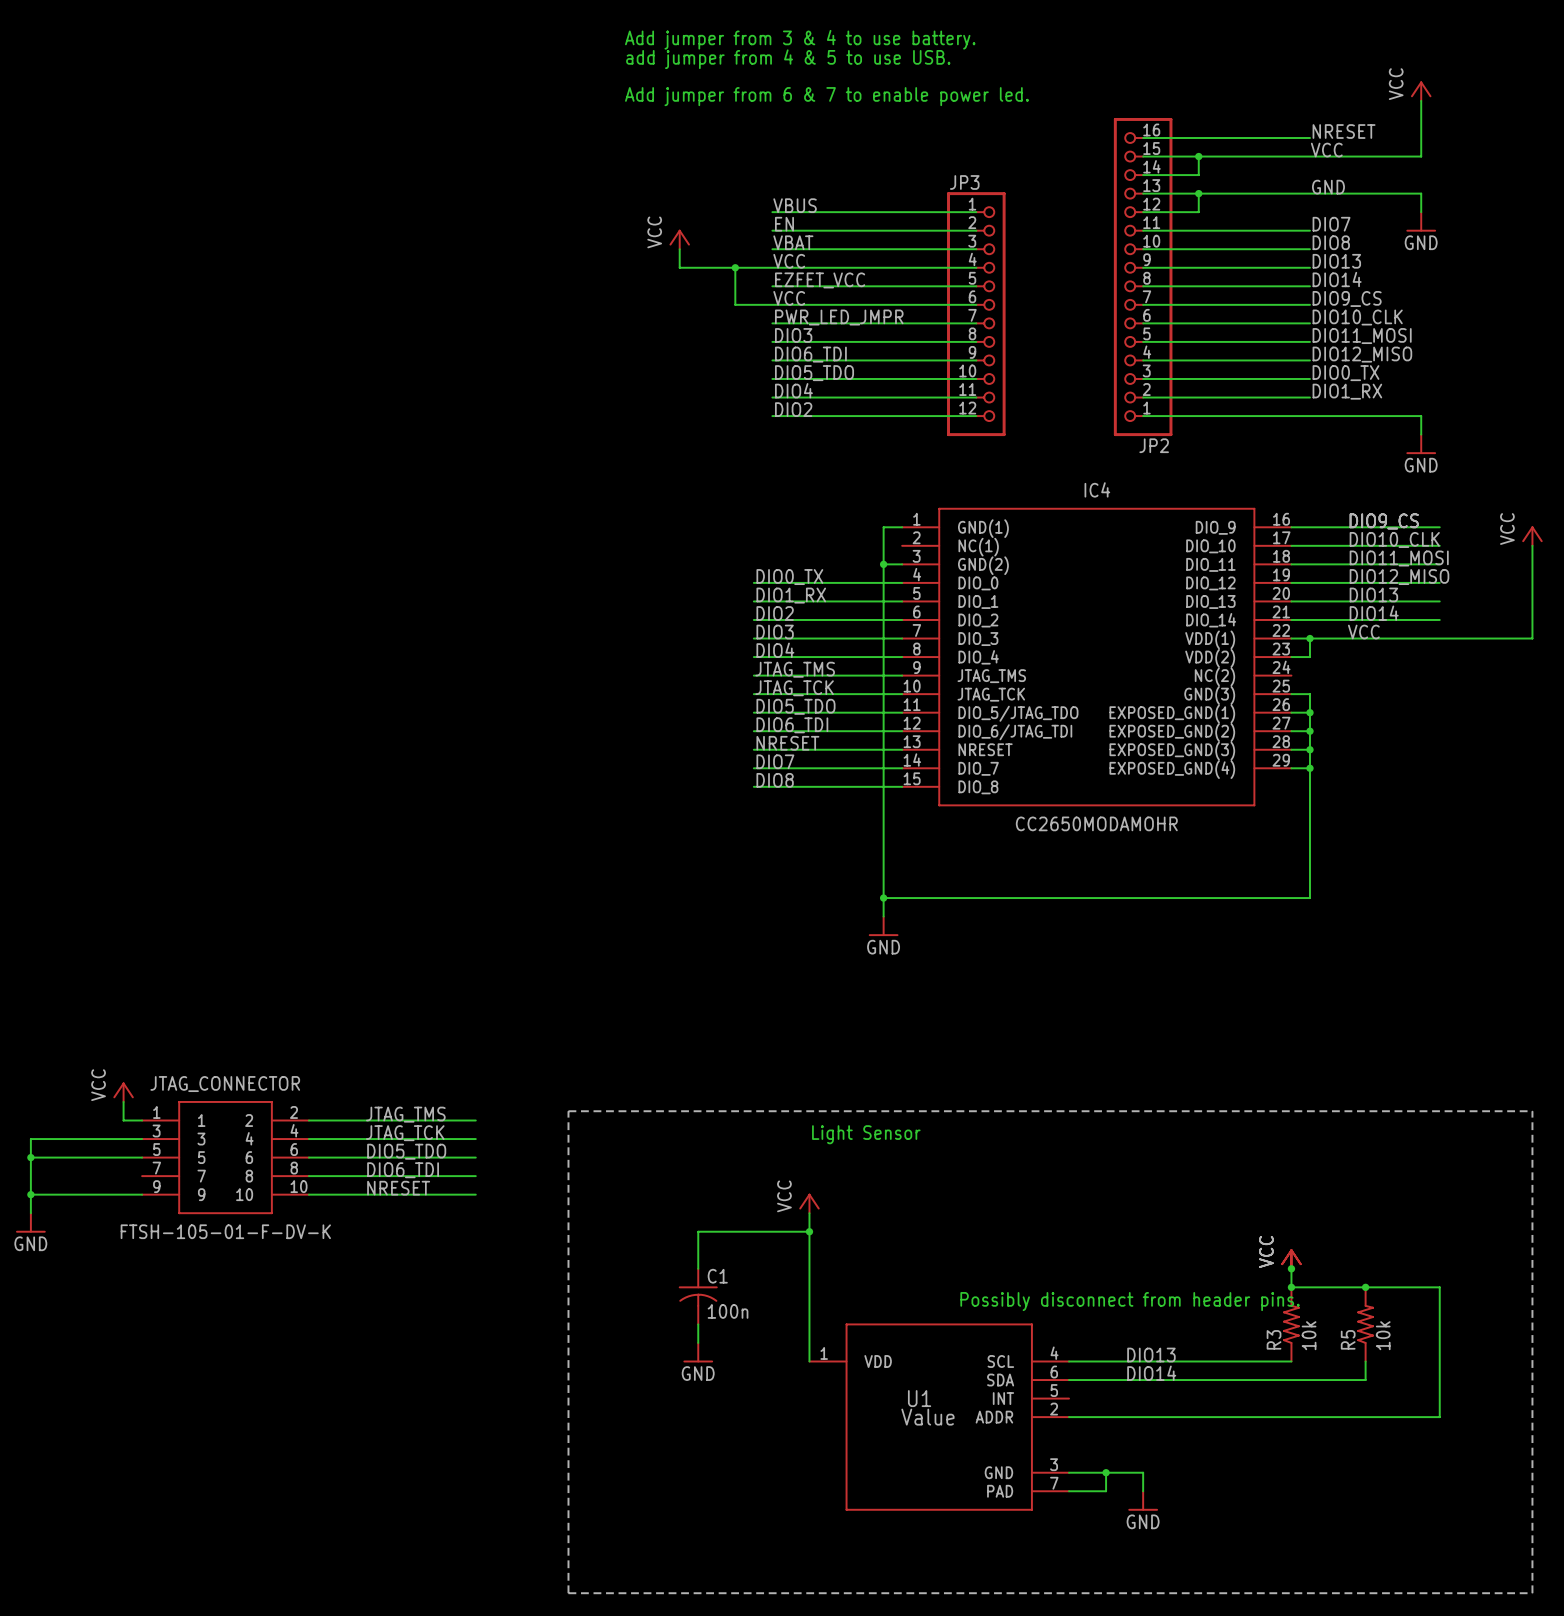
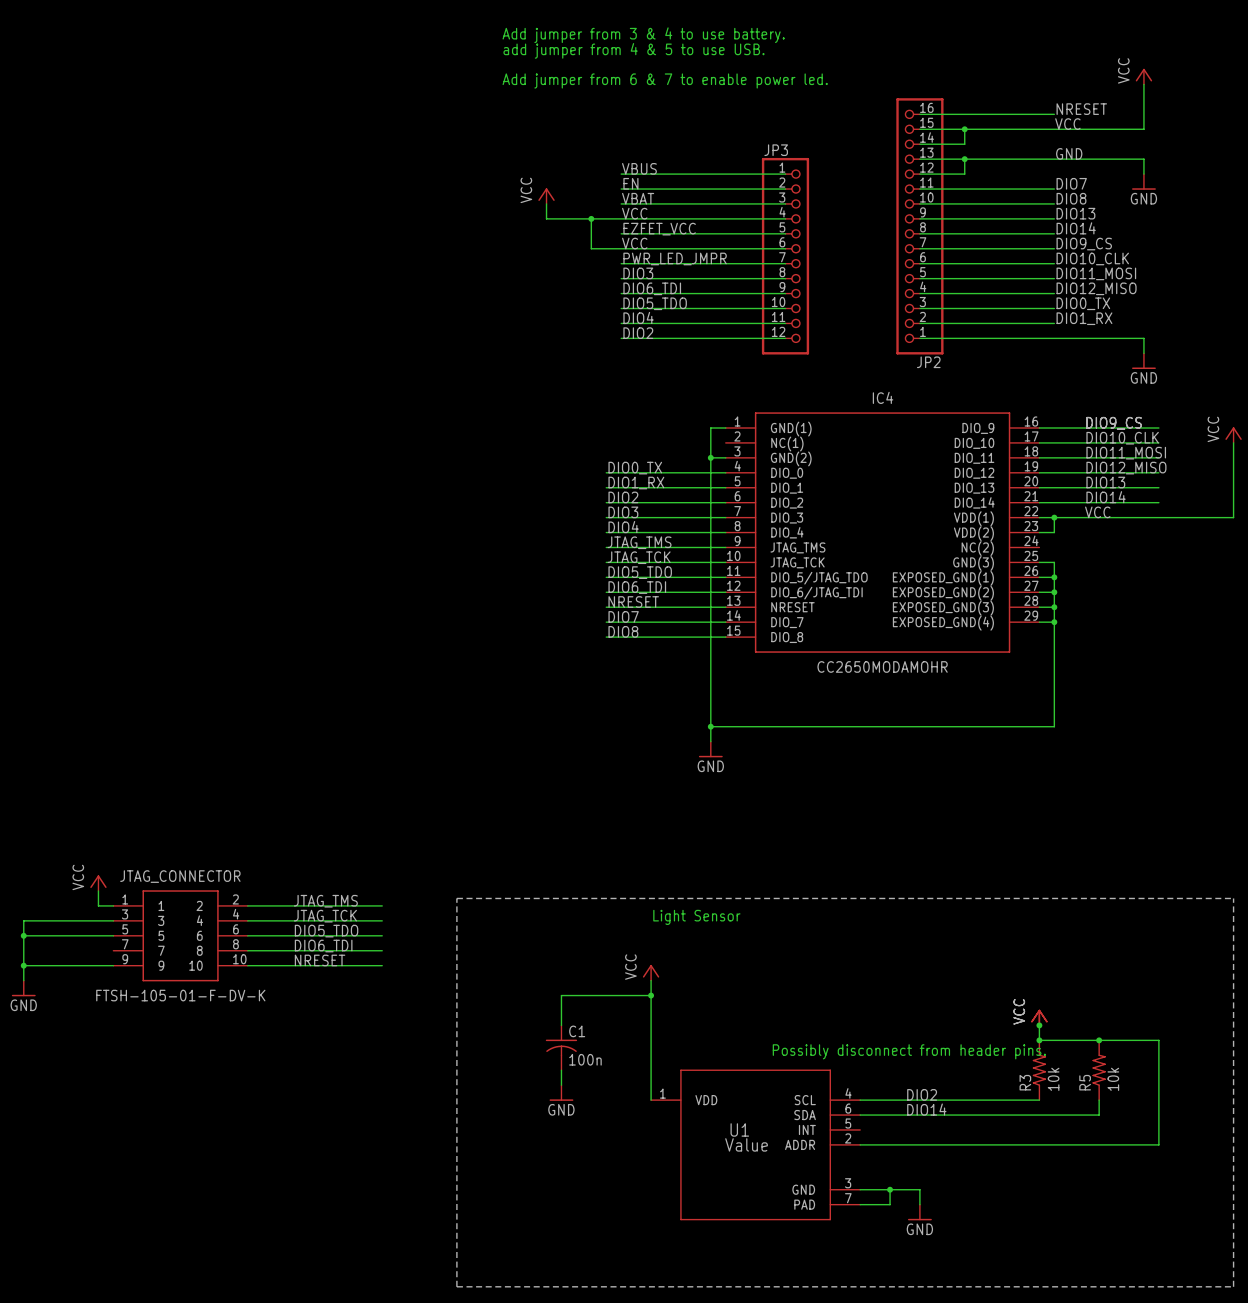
label: DIO13 (1151, 1355) -> DIO2 (922, 1094)

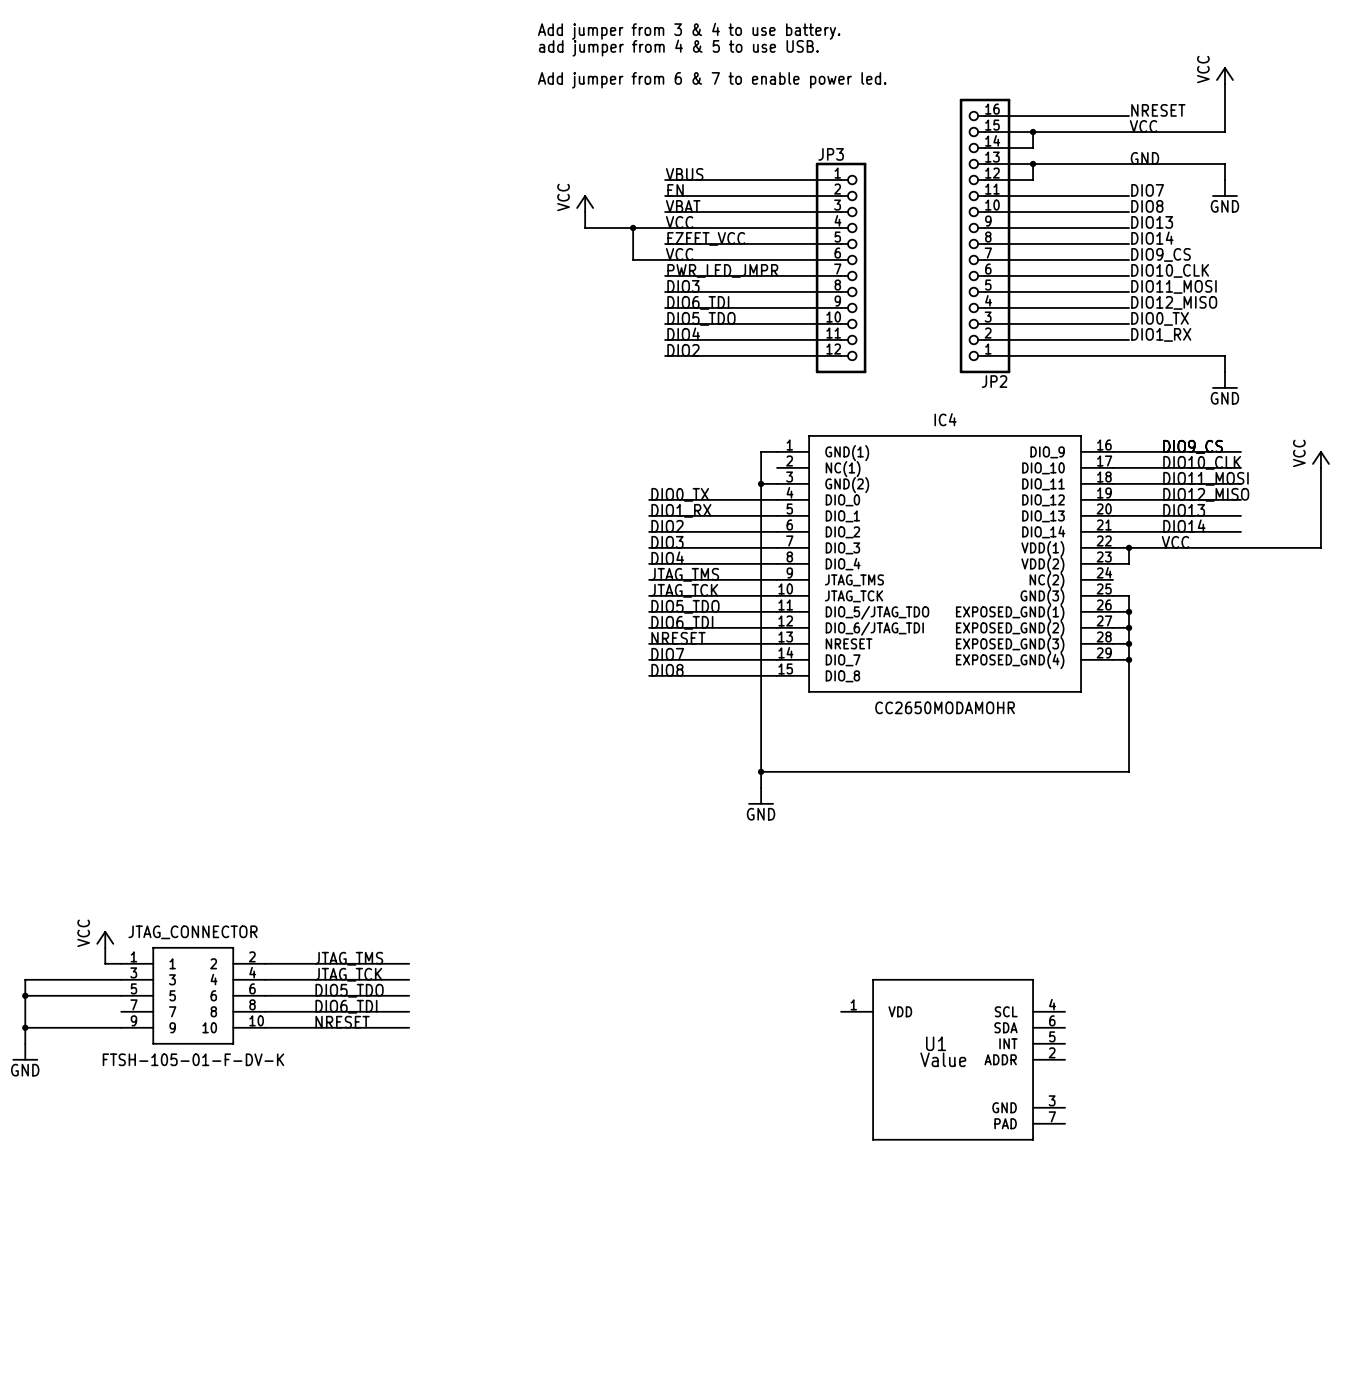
line: (456, 898) (1233, 898) (1233, 1286) (456, 1286) (456, 898) -> none
text: Light Sensor (696, 917) -> none
power symbol: VCC (651, 972) -> none
wire: (651, 980) (651, 1100) -> none
wire: (651, 995) (561, 995) (561, 1025) -> none
junction: (651, 995) -> none
power symbol: VCC (1039, 1017) -> none
wire: (1039, 1025) (1039, 1040) (1158, 1040) (1158, 1144) (860, 1144) -> none
junction: (1039, 1025) -> none
junction: (1039, 1040) -> none
junction: (1099, 1040) -> none
C1: 100n (561, 1047) -> none
text: Possibly disconnect from header pins. (909, 1051) -> none
wire: (561, 1070) (561, 1085) -> none
R3: 10k (1039, 1070) -> none
R5: 10k (1099, 1070) -> none
power symbol: GND (561, 1093) -> none
label: DIO2 (922, 1094) -> none
wire: (860, 1100) (1039, 1100) -> none
wire: (1099, 1100) (1099, 1115) (860, 1115) -> none
label: DIO14 (926, 1109) -> none
U1 position: (755, 1144) -> (953, 1059)
wire: (860, 1189) (919, 1189) (919, 1204) -> none
wire: (890, 1189) (890, 1204) (860, 1204) -> none
junction: (890, 1189) -> none
power symbol: GND (919, 1212) -> none

